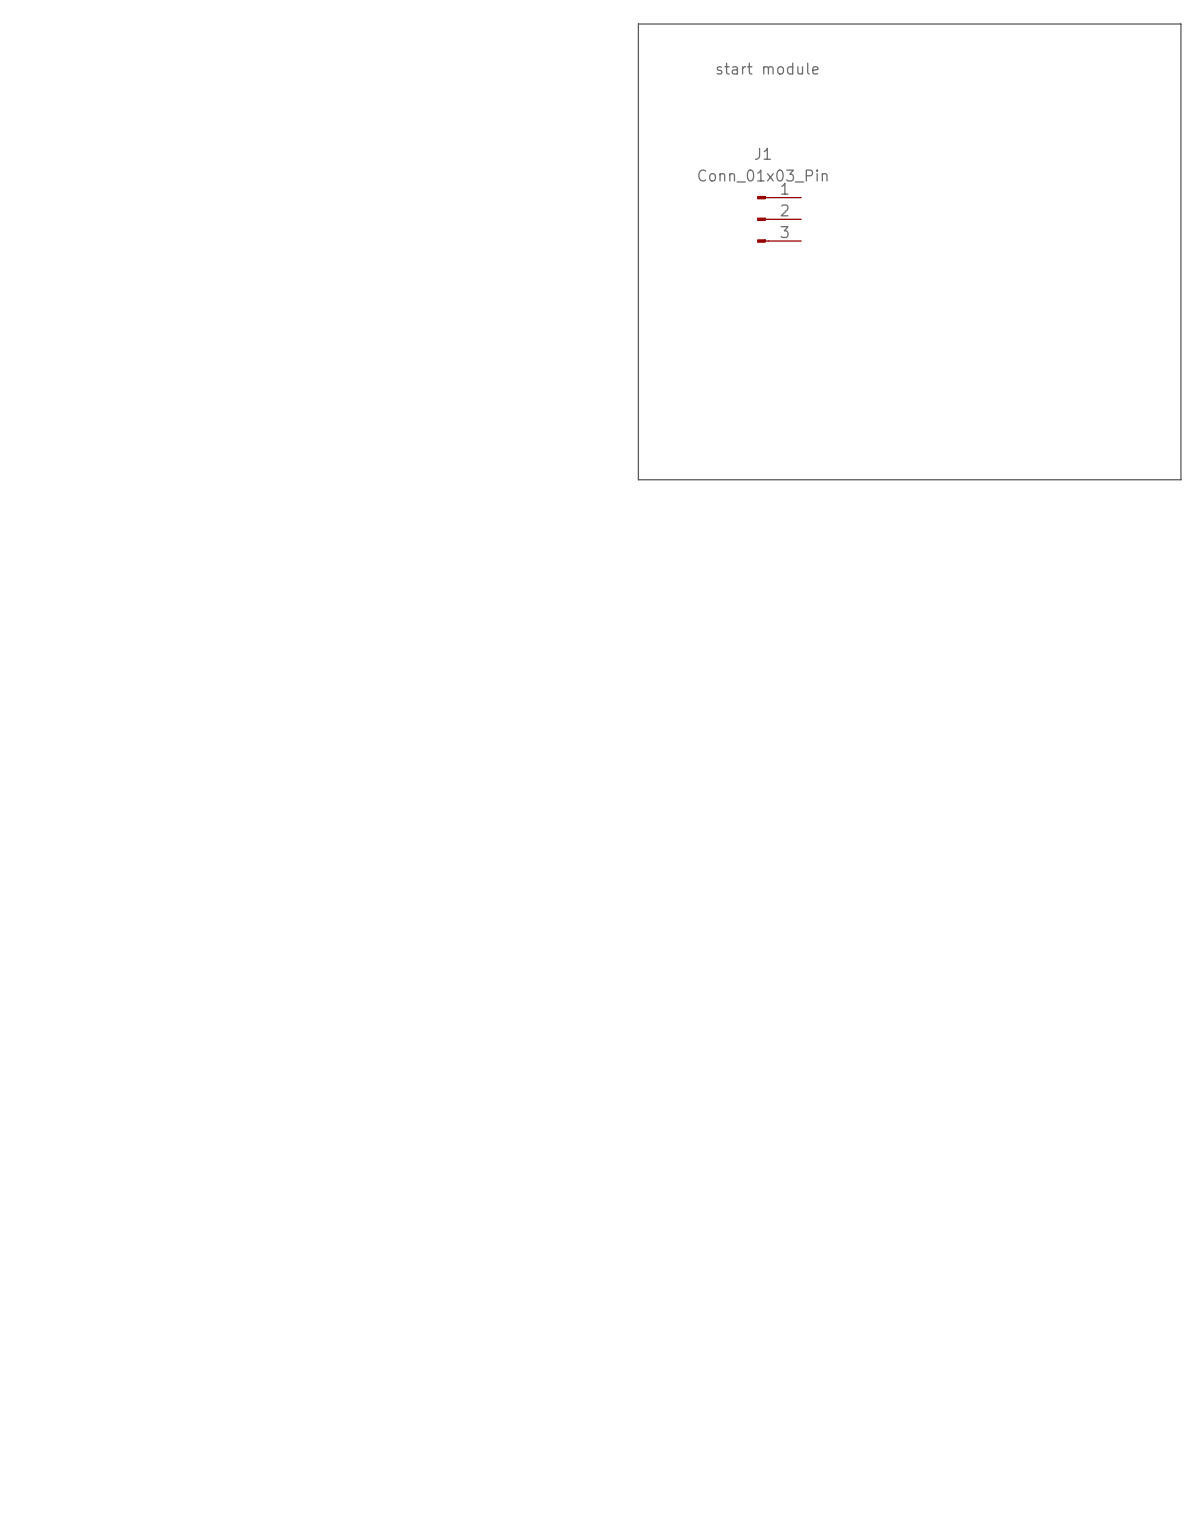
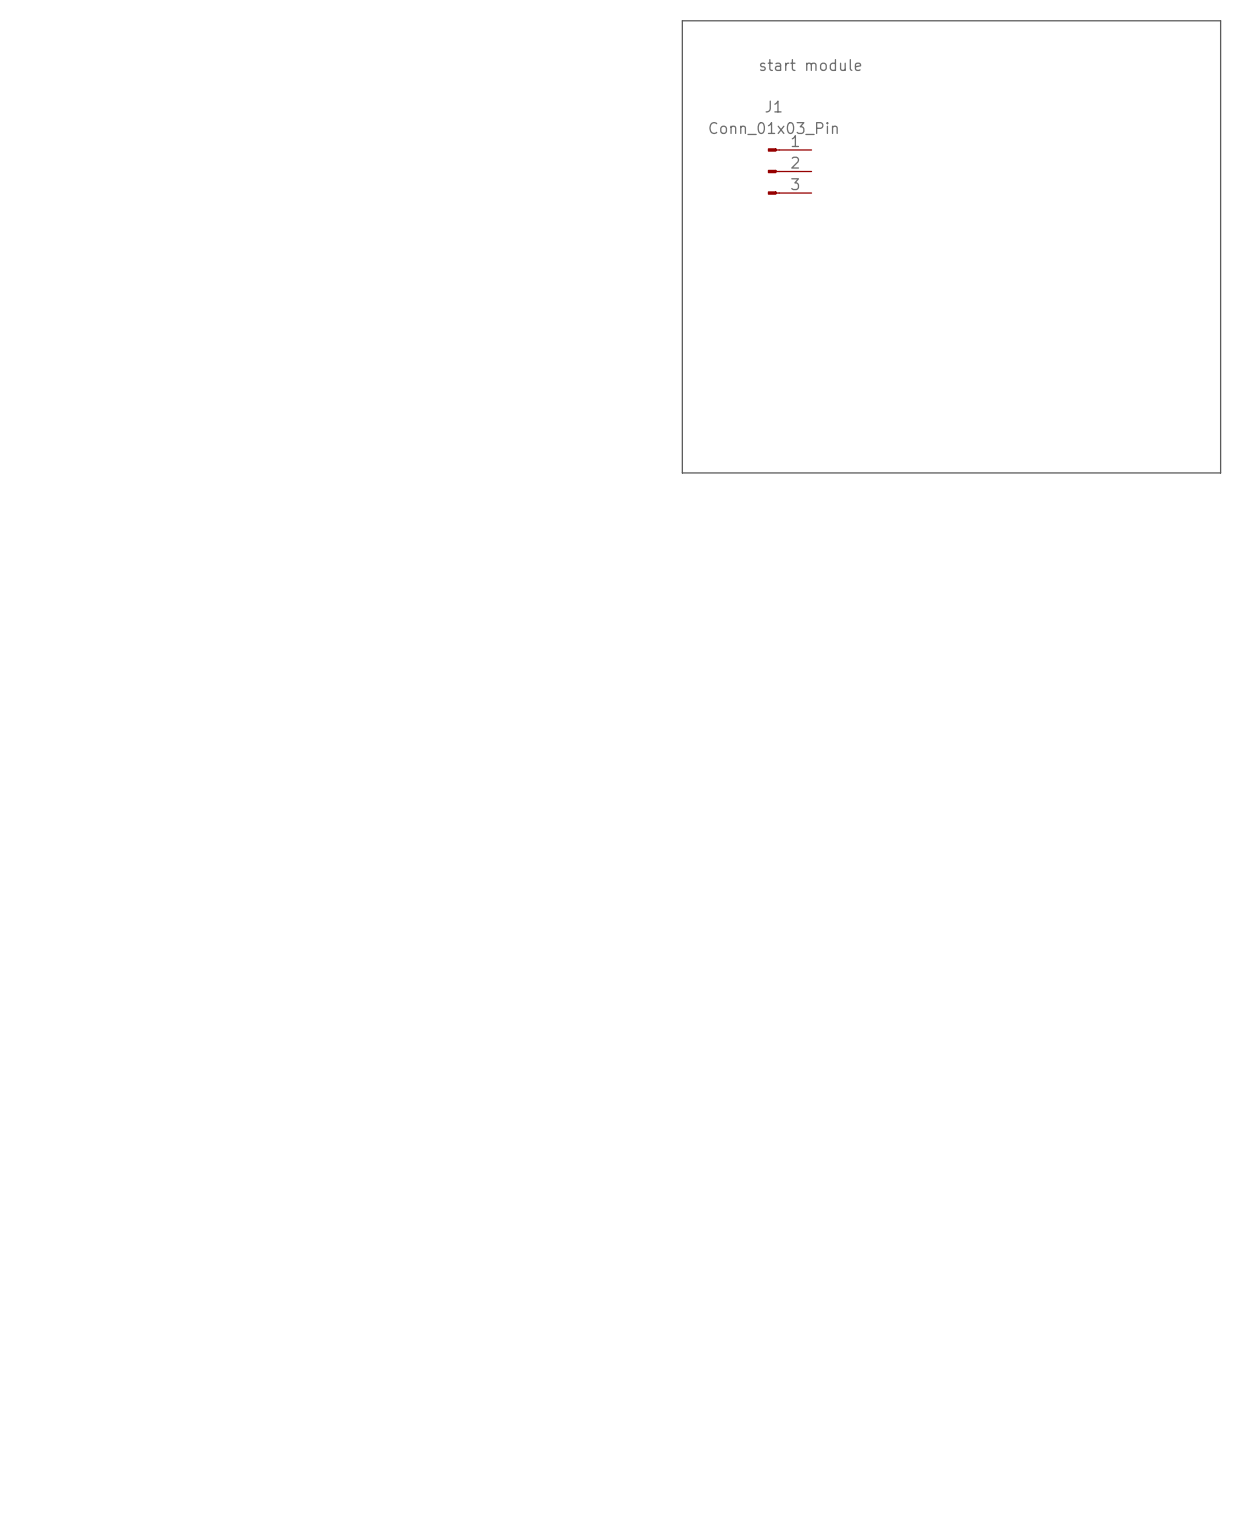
J1 position: (779, 219) -> (789, 171)

